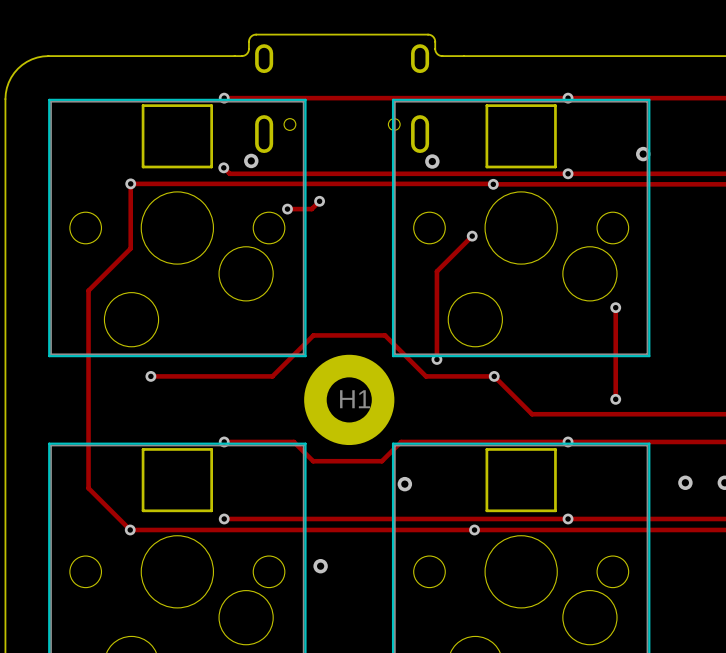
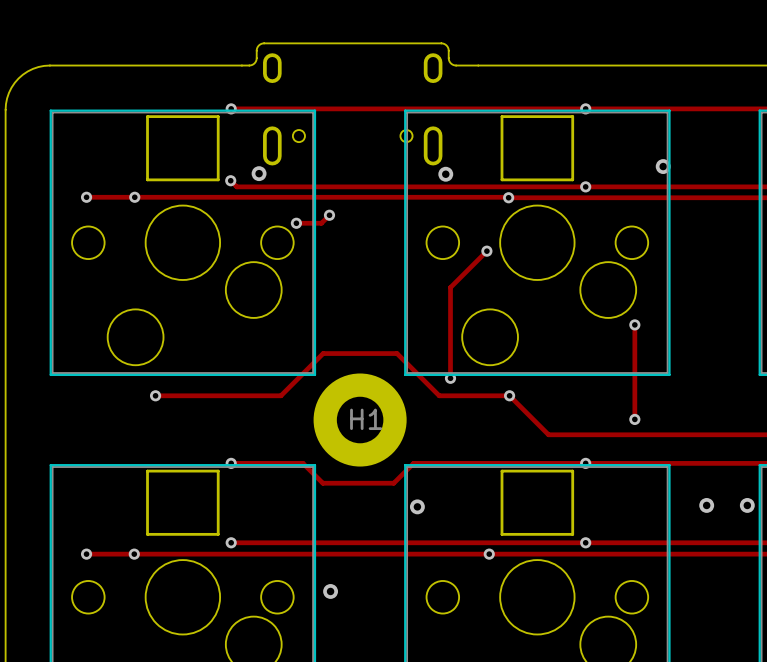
via: none -> (86, 197)
track: (130, 183) (130, 248) (88, 290) (88, 488) (130, 529) -> (134, 197) (86, 197)
track: none -> (86, 554) (134, 554)
via: none -> (86, 554)

